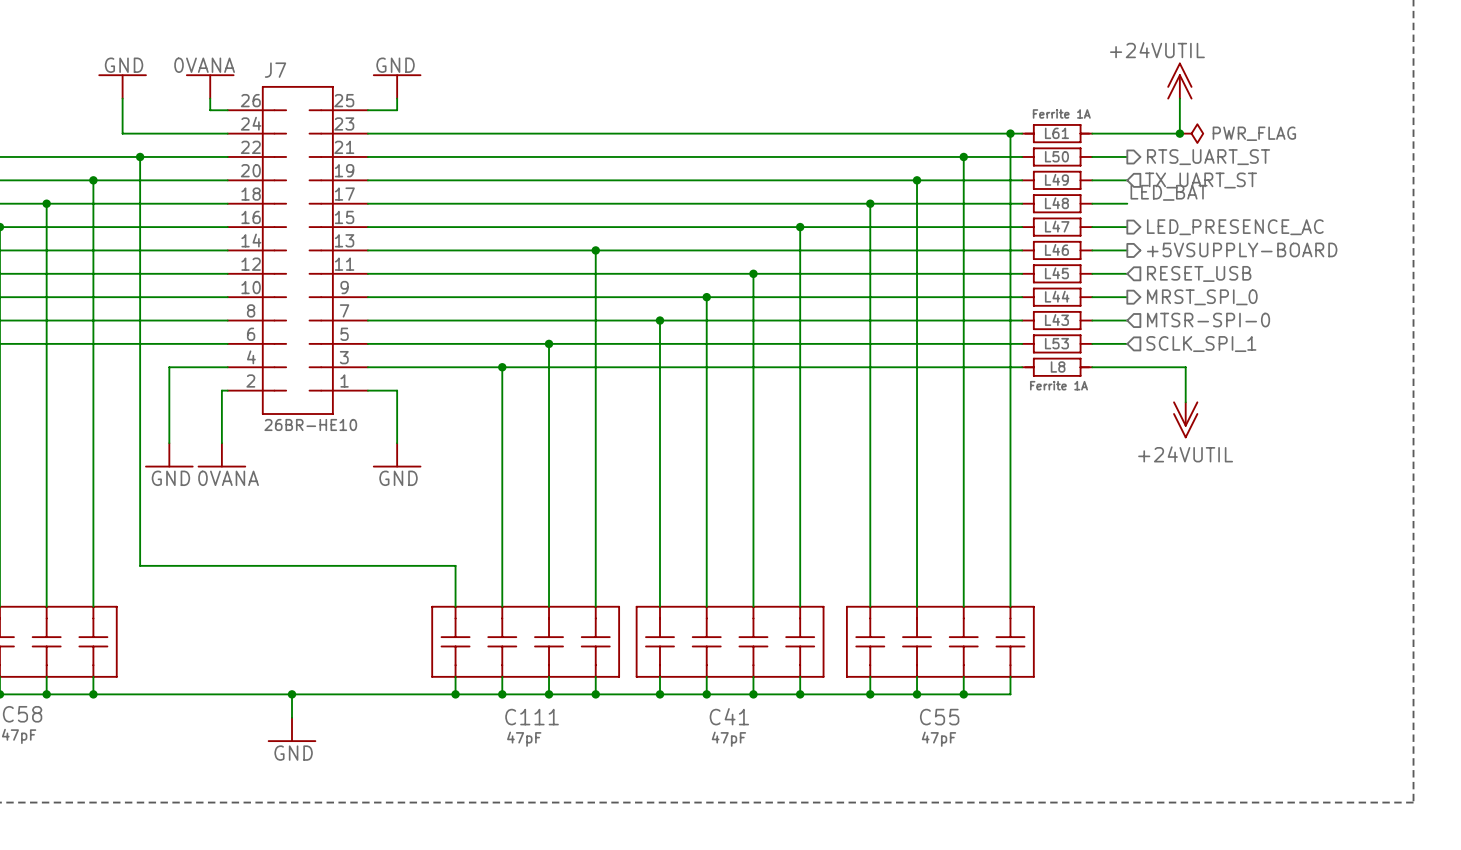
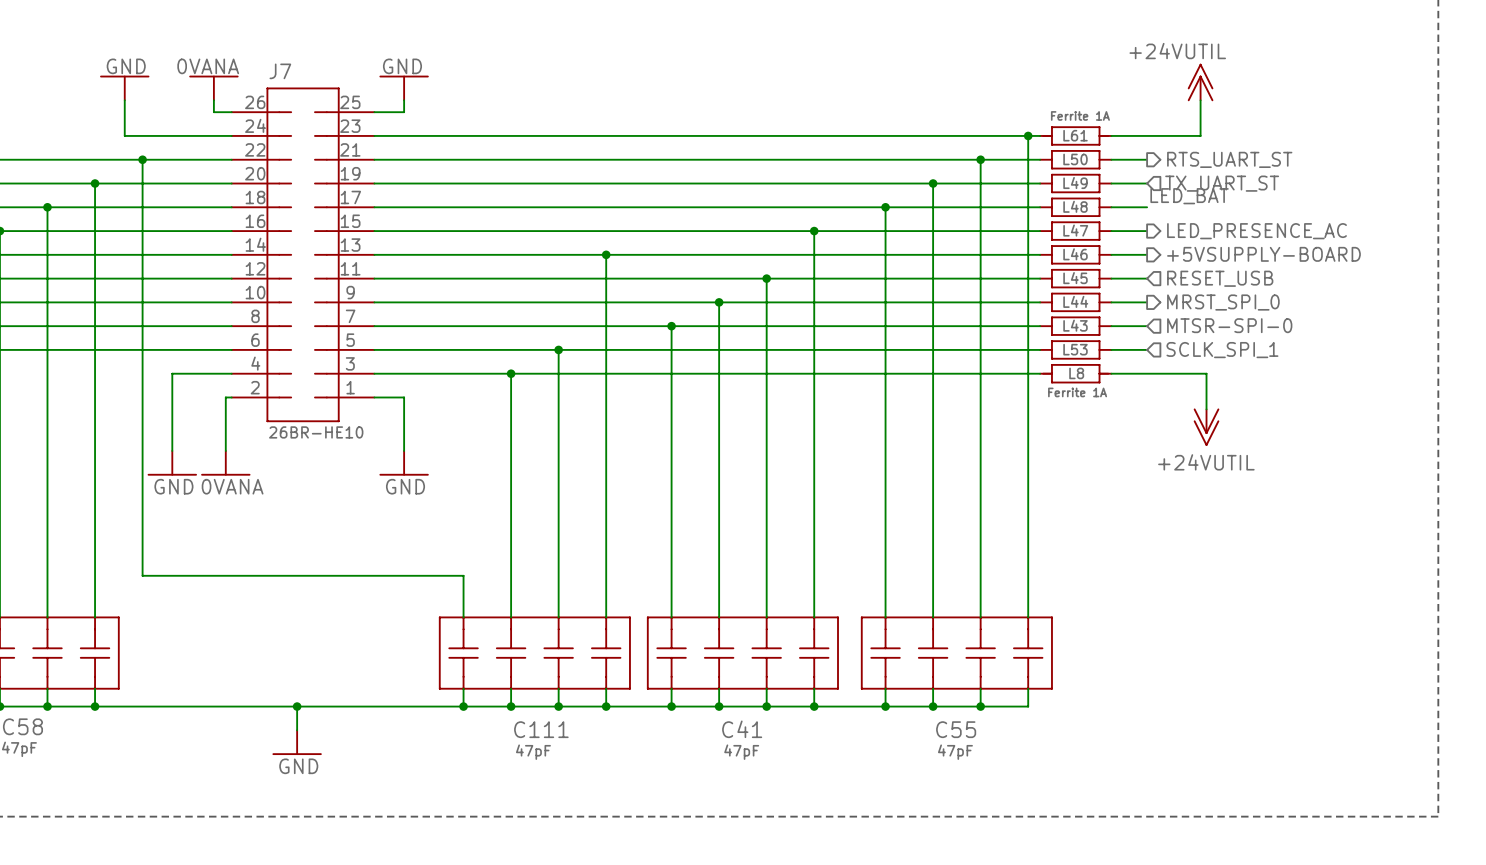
junction: (1179, 133) -> none
power symbol: PWR_FLAG (1191, 133) -> none

